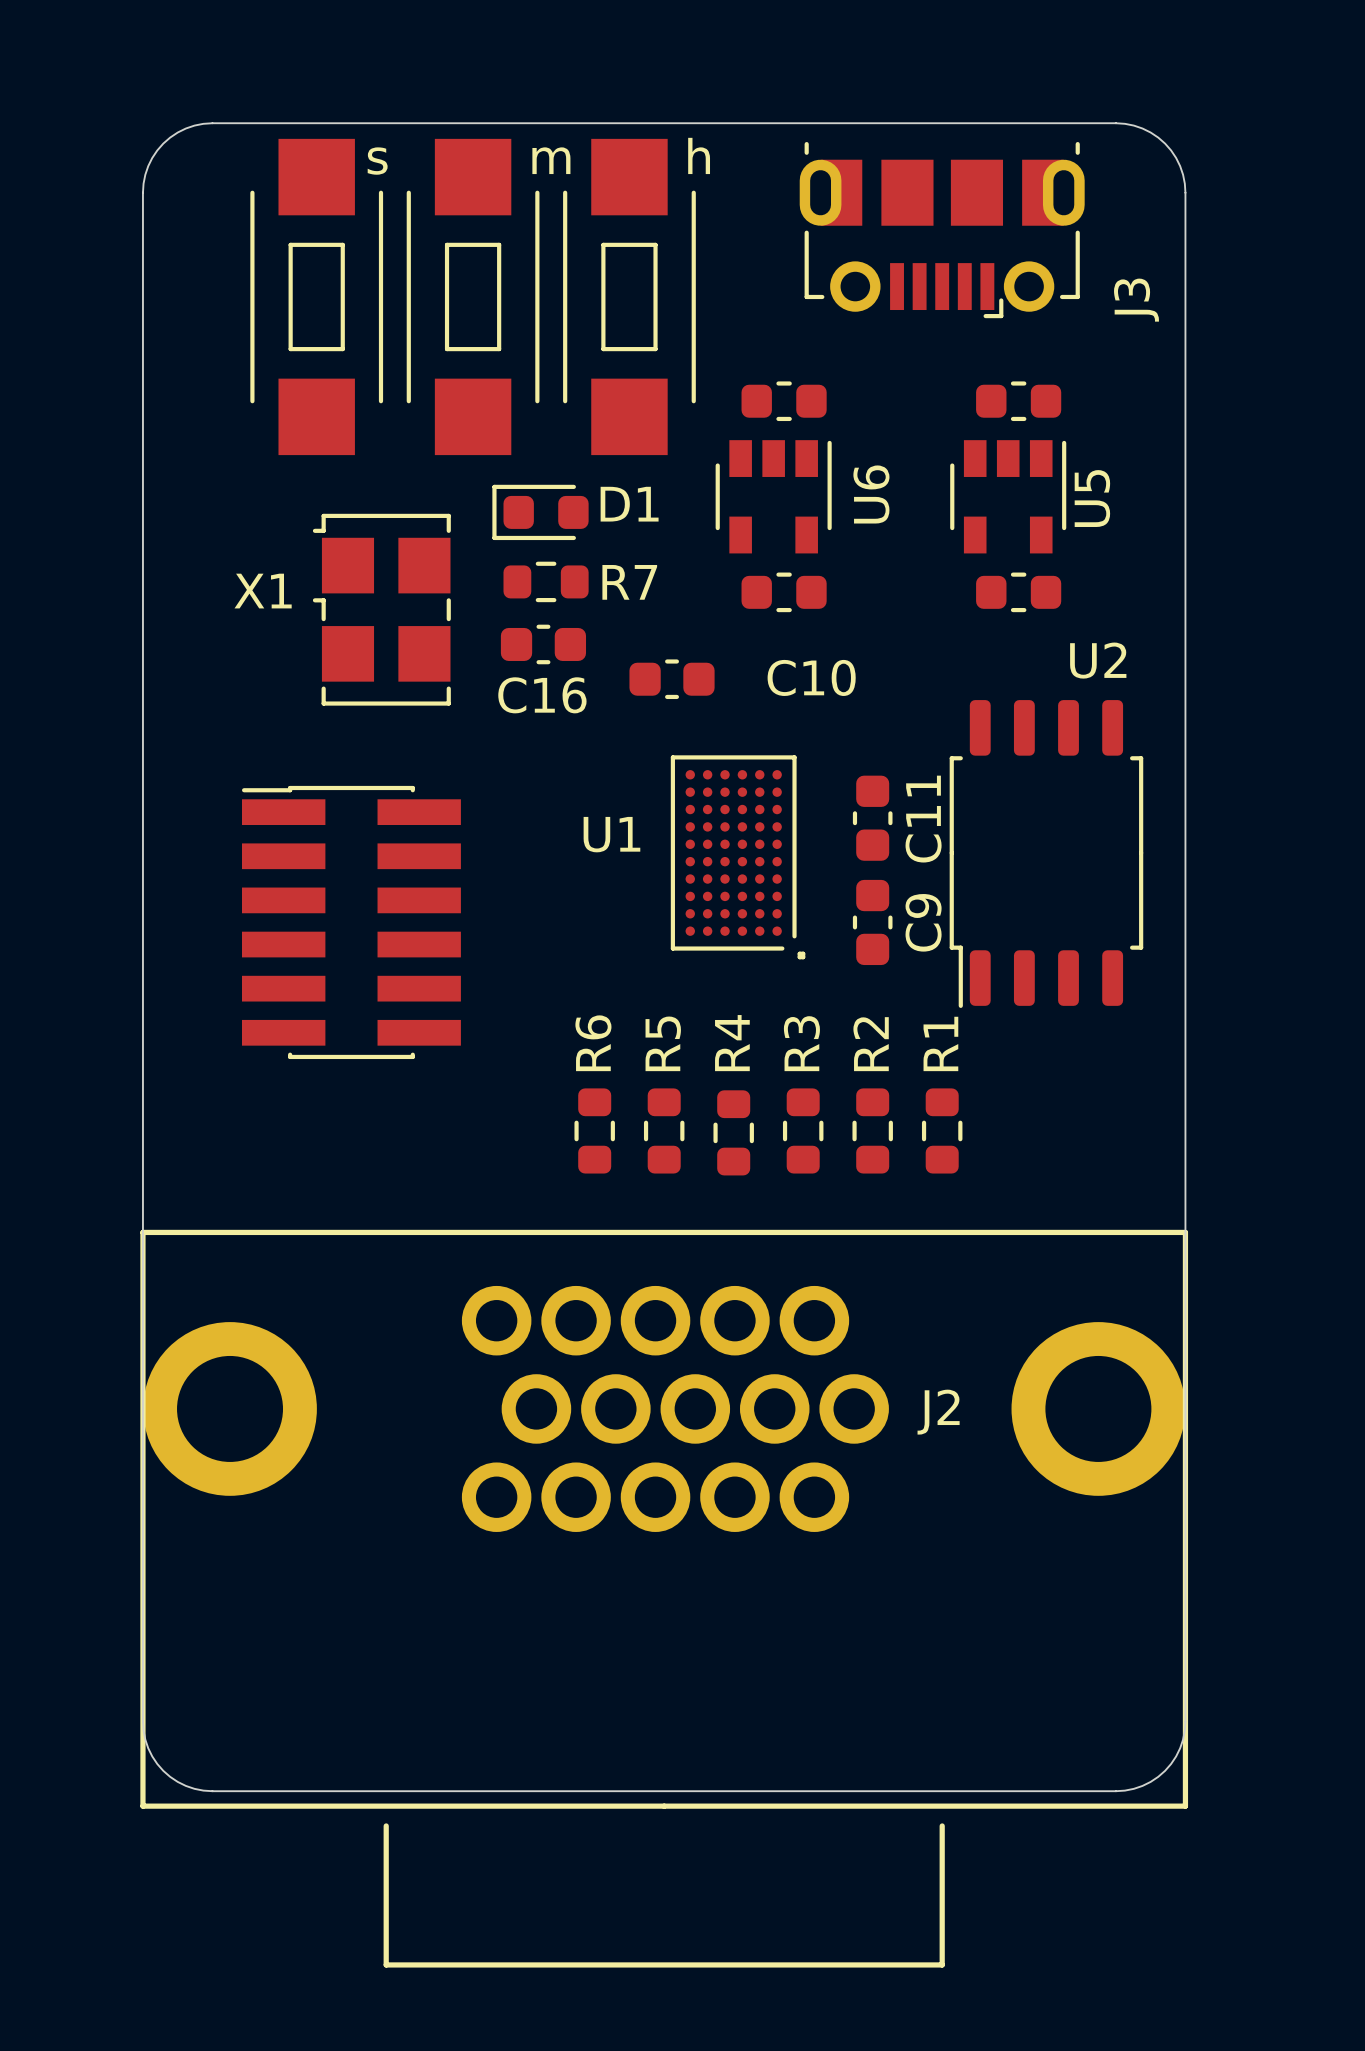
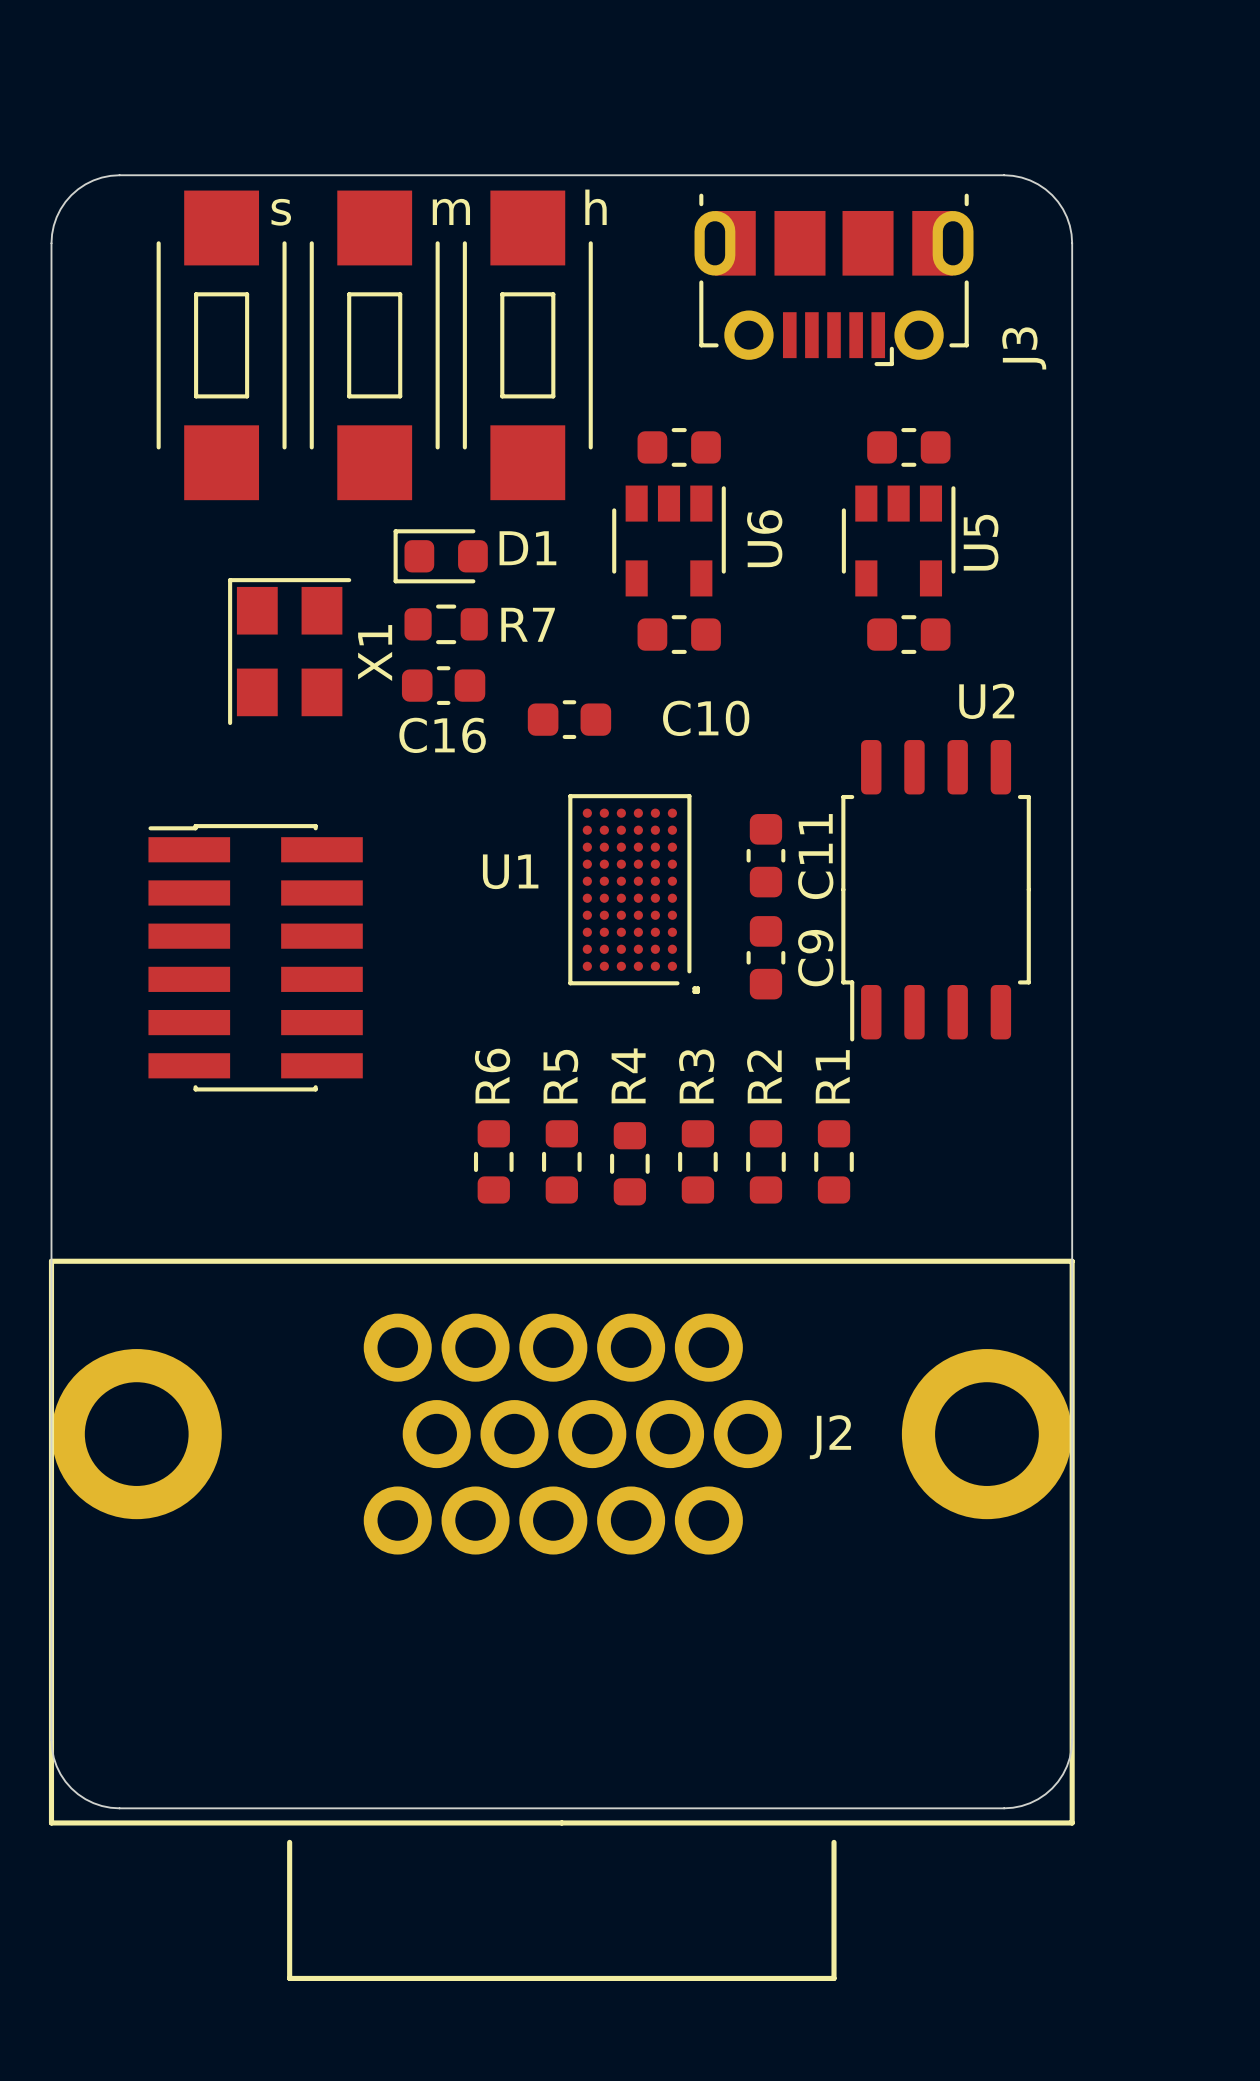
X1 footprint: [312, 513, 451, 706] -> [228, 578, 352, 726]
X1 name position: X1 (263, 591) -> X1 (375, 653)

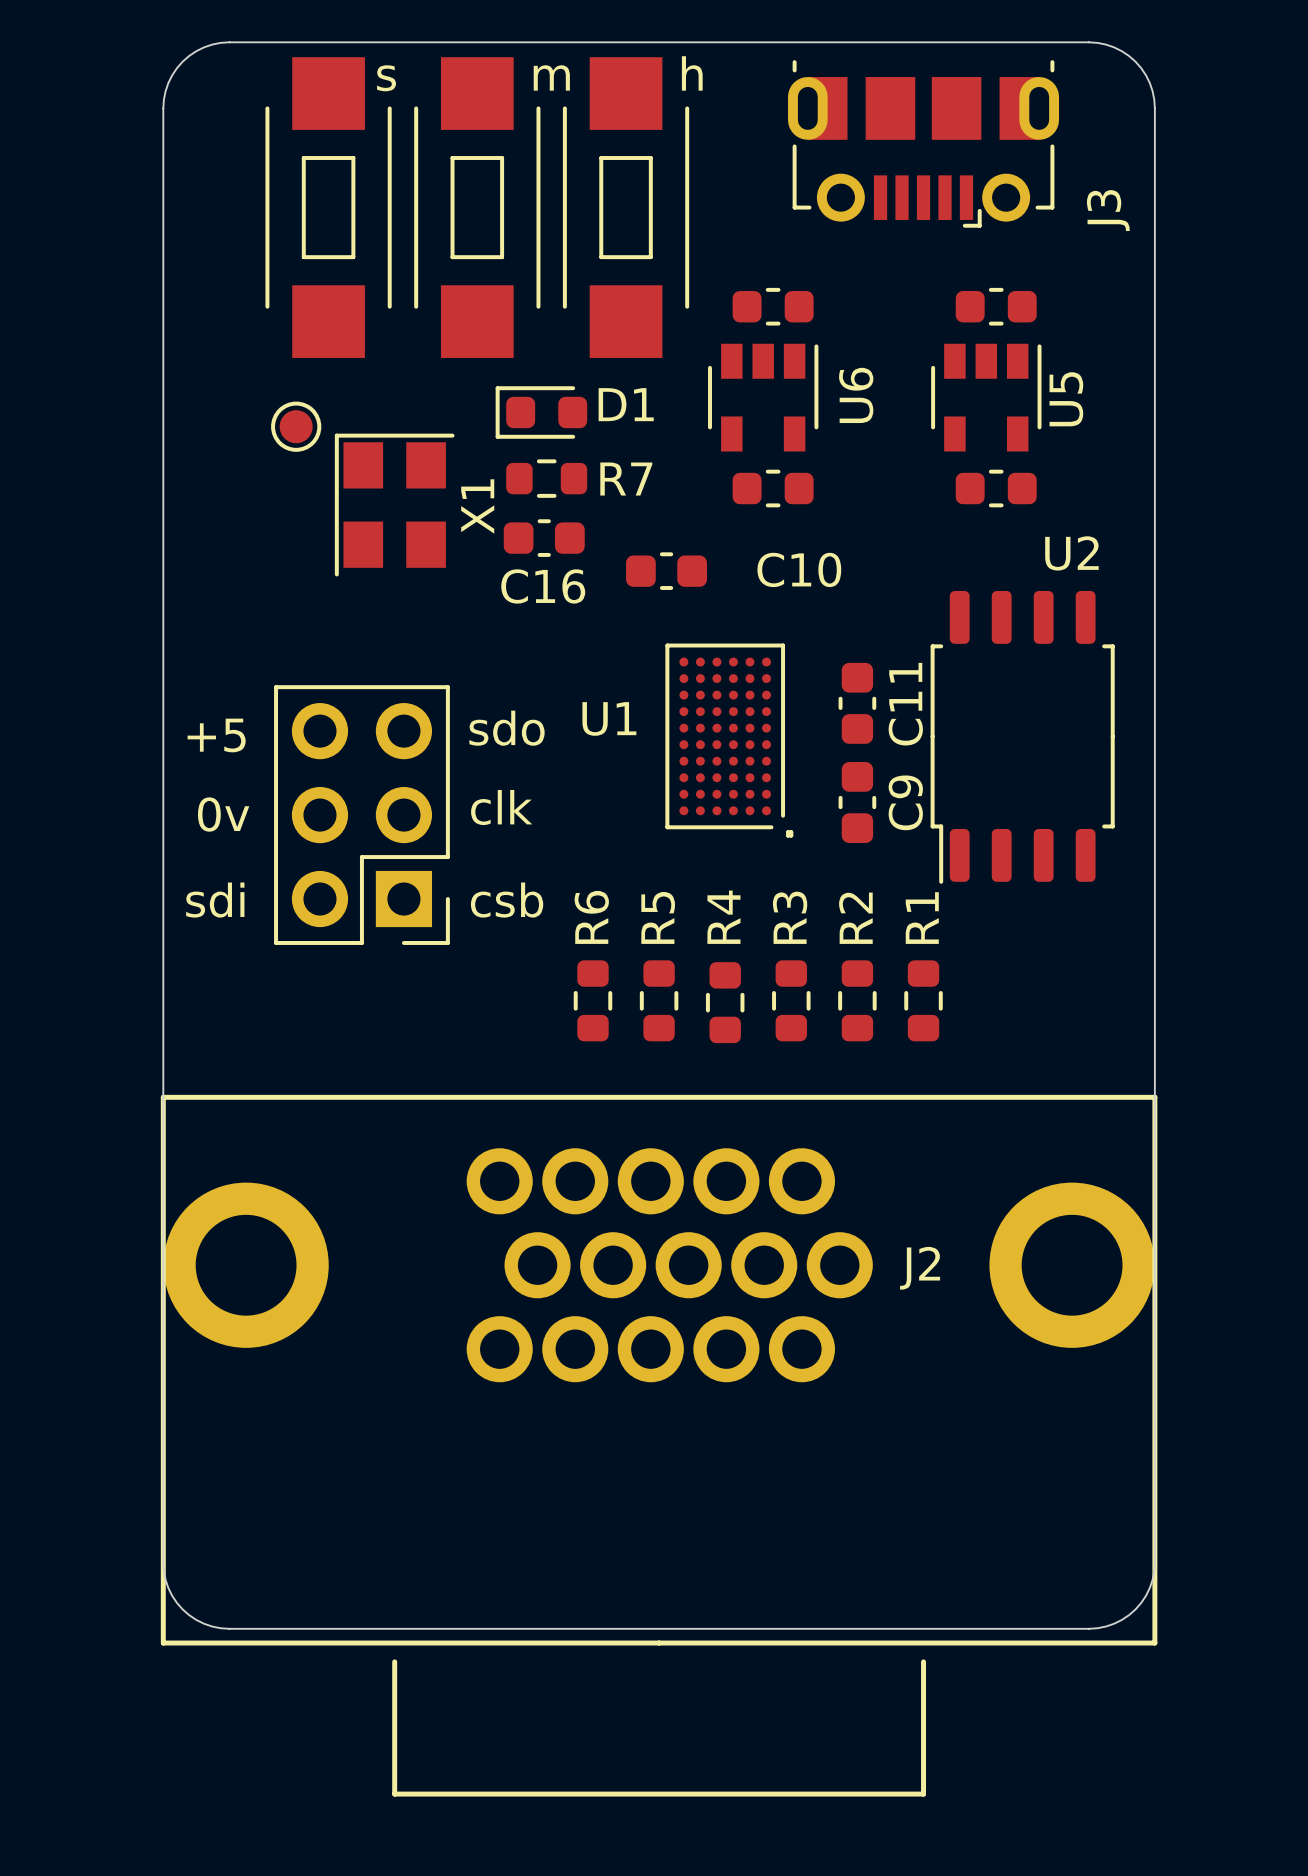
part: none -> (296, 426)
part footprint: [148, 824, 363, 1092] -> [274, 685, 450, 945]
text: none -> sdo (507, 728)
text: none -> +5 (216, 735)
text: none -> clk (501, 807)
text: none -> 0v (223, 814)
text: none -> sdi (215, 900)
text: none -> csb (507, 900)

